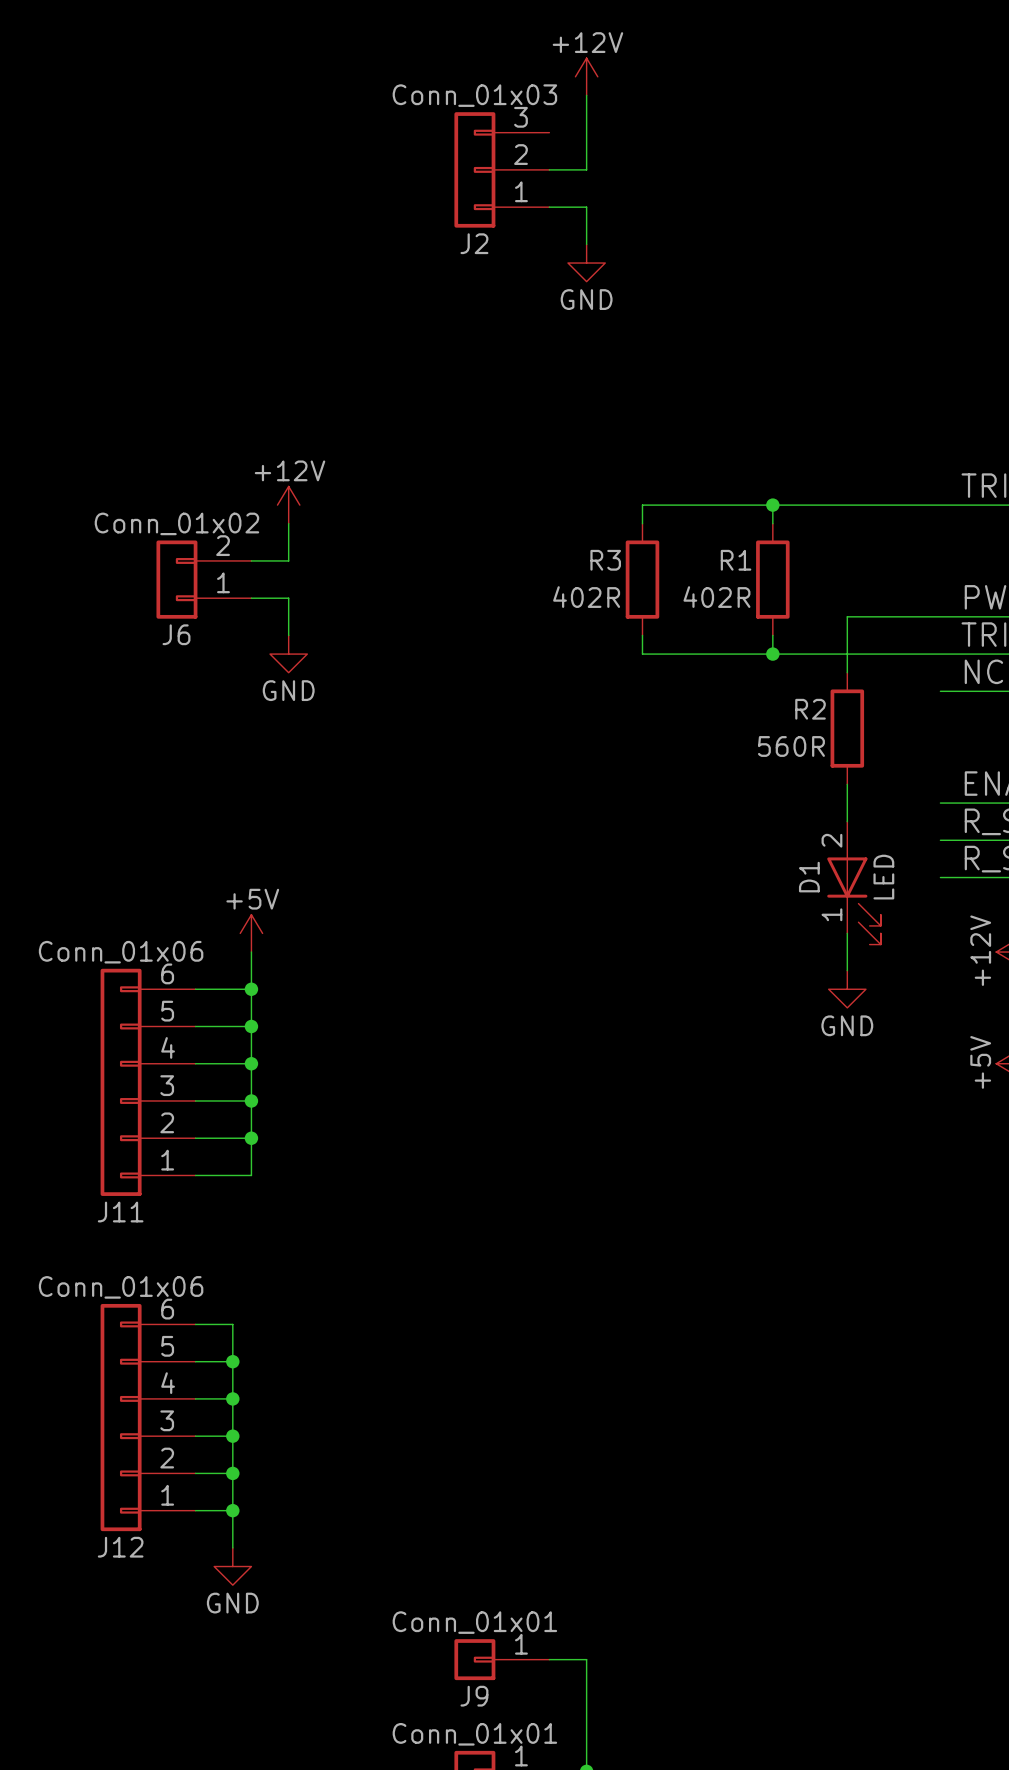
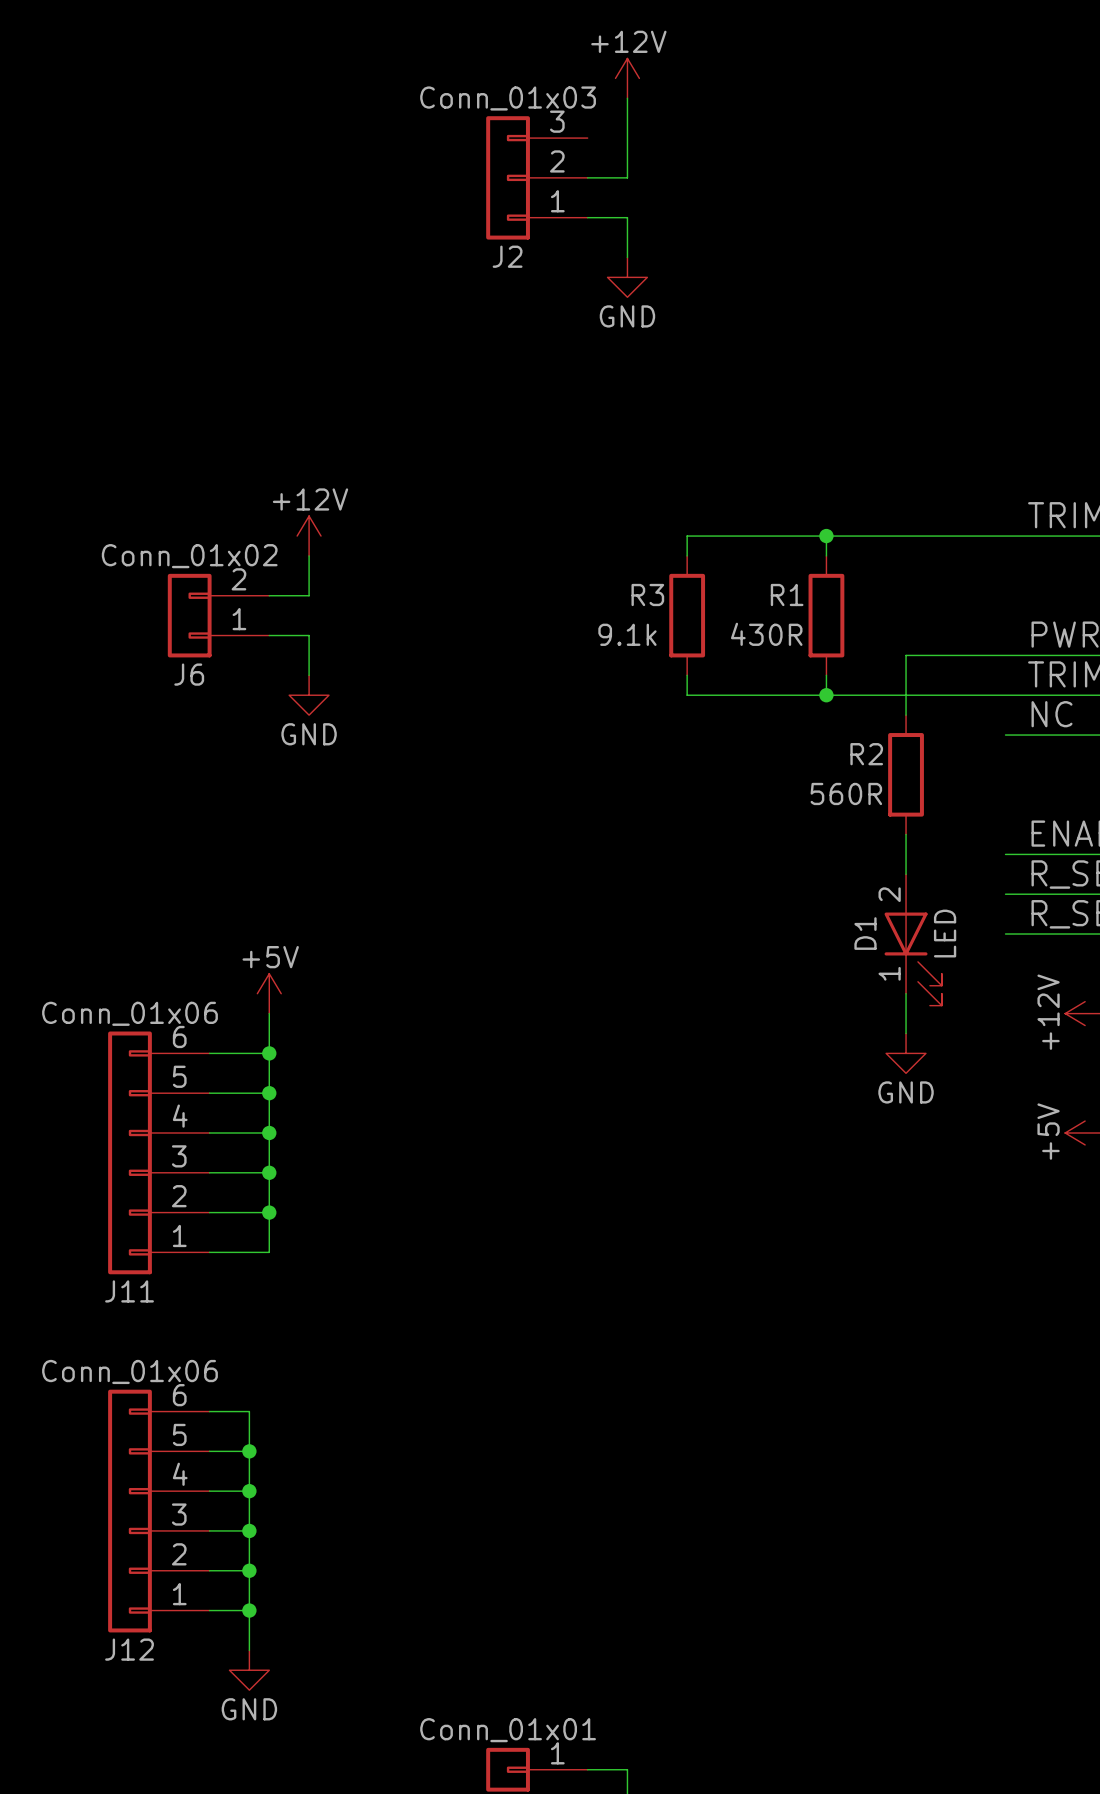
R3 value: 402R (586, 597) -> 9.1k (627, 634)
R1 value: 402R (716, 597) -> 430R (766, 634)

